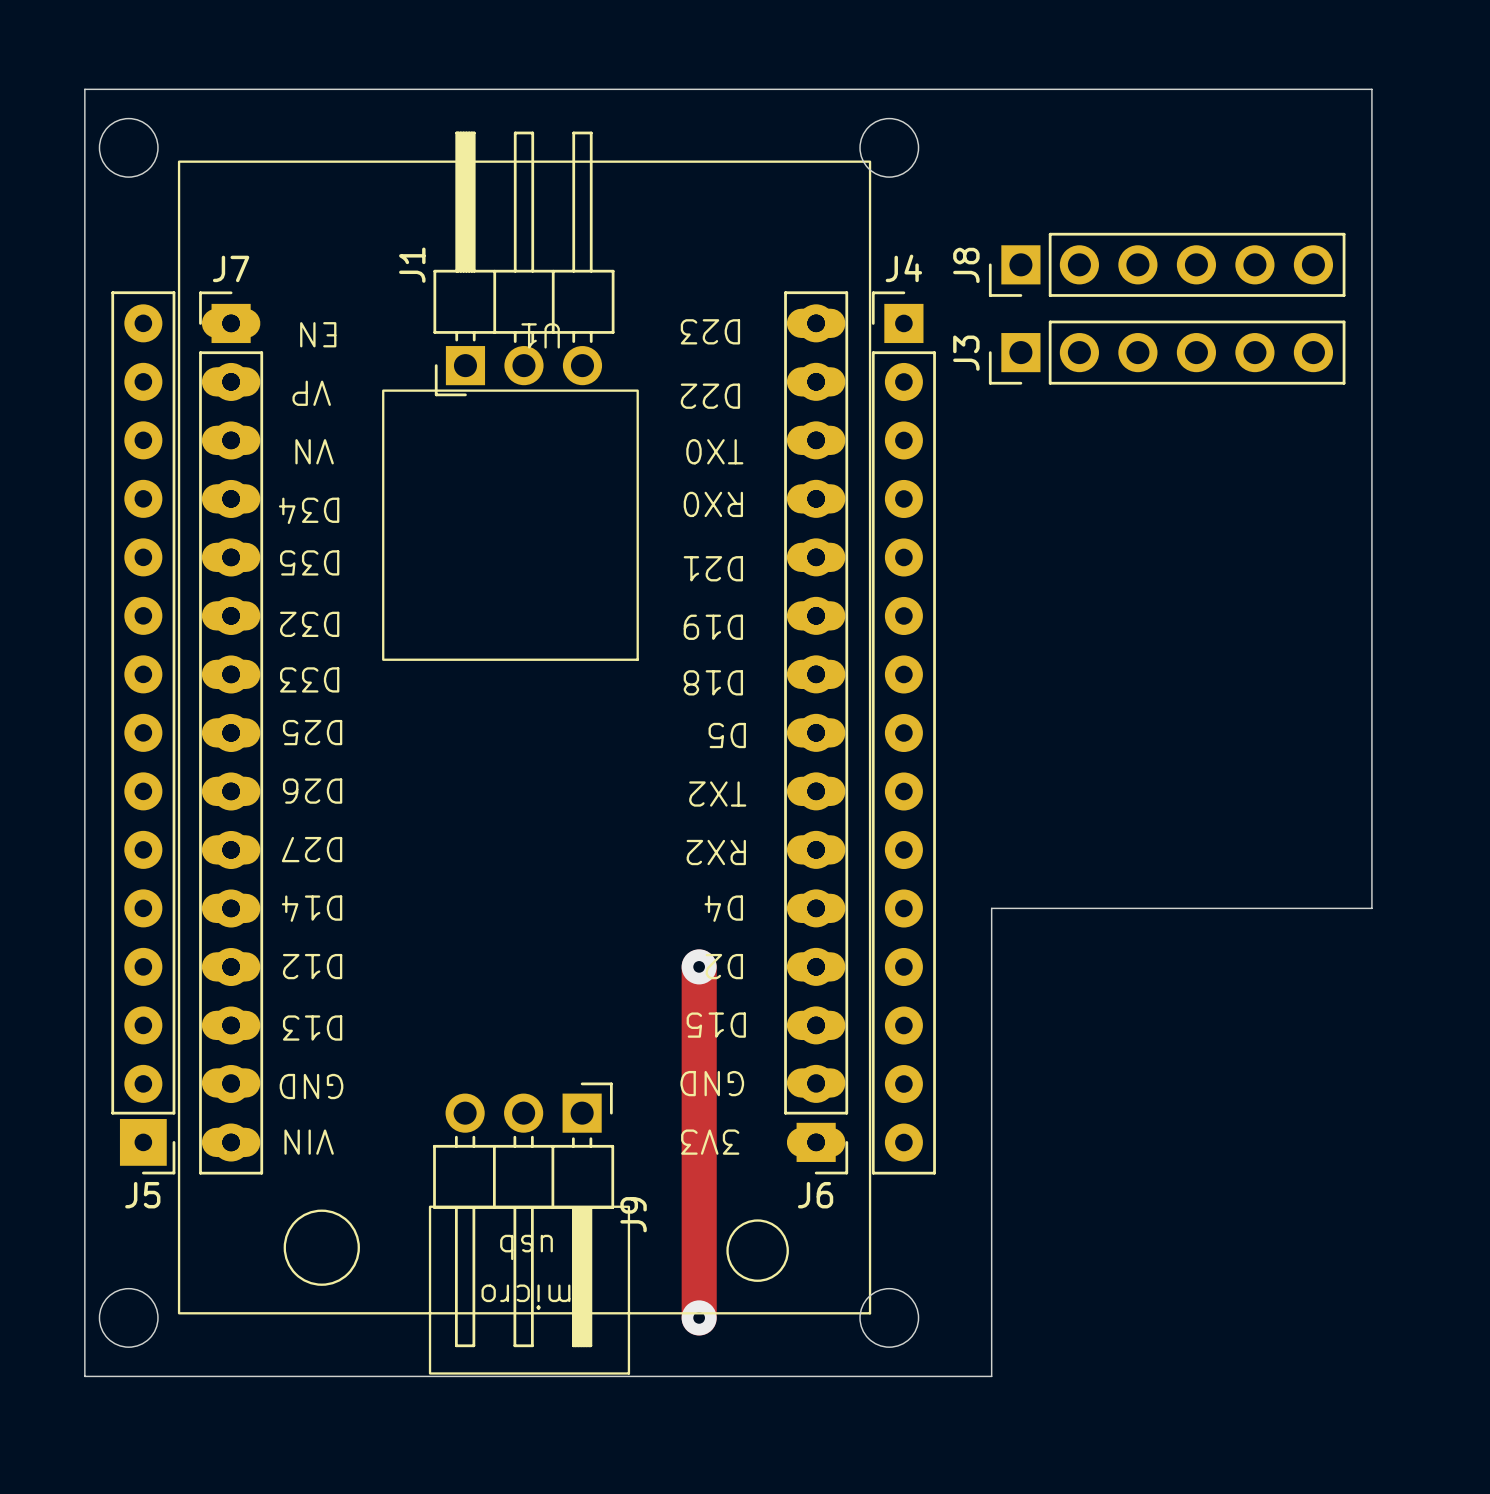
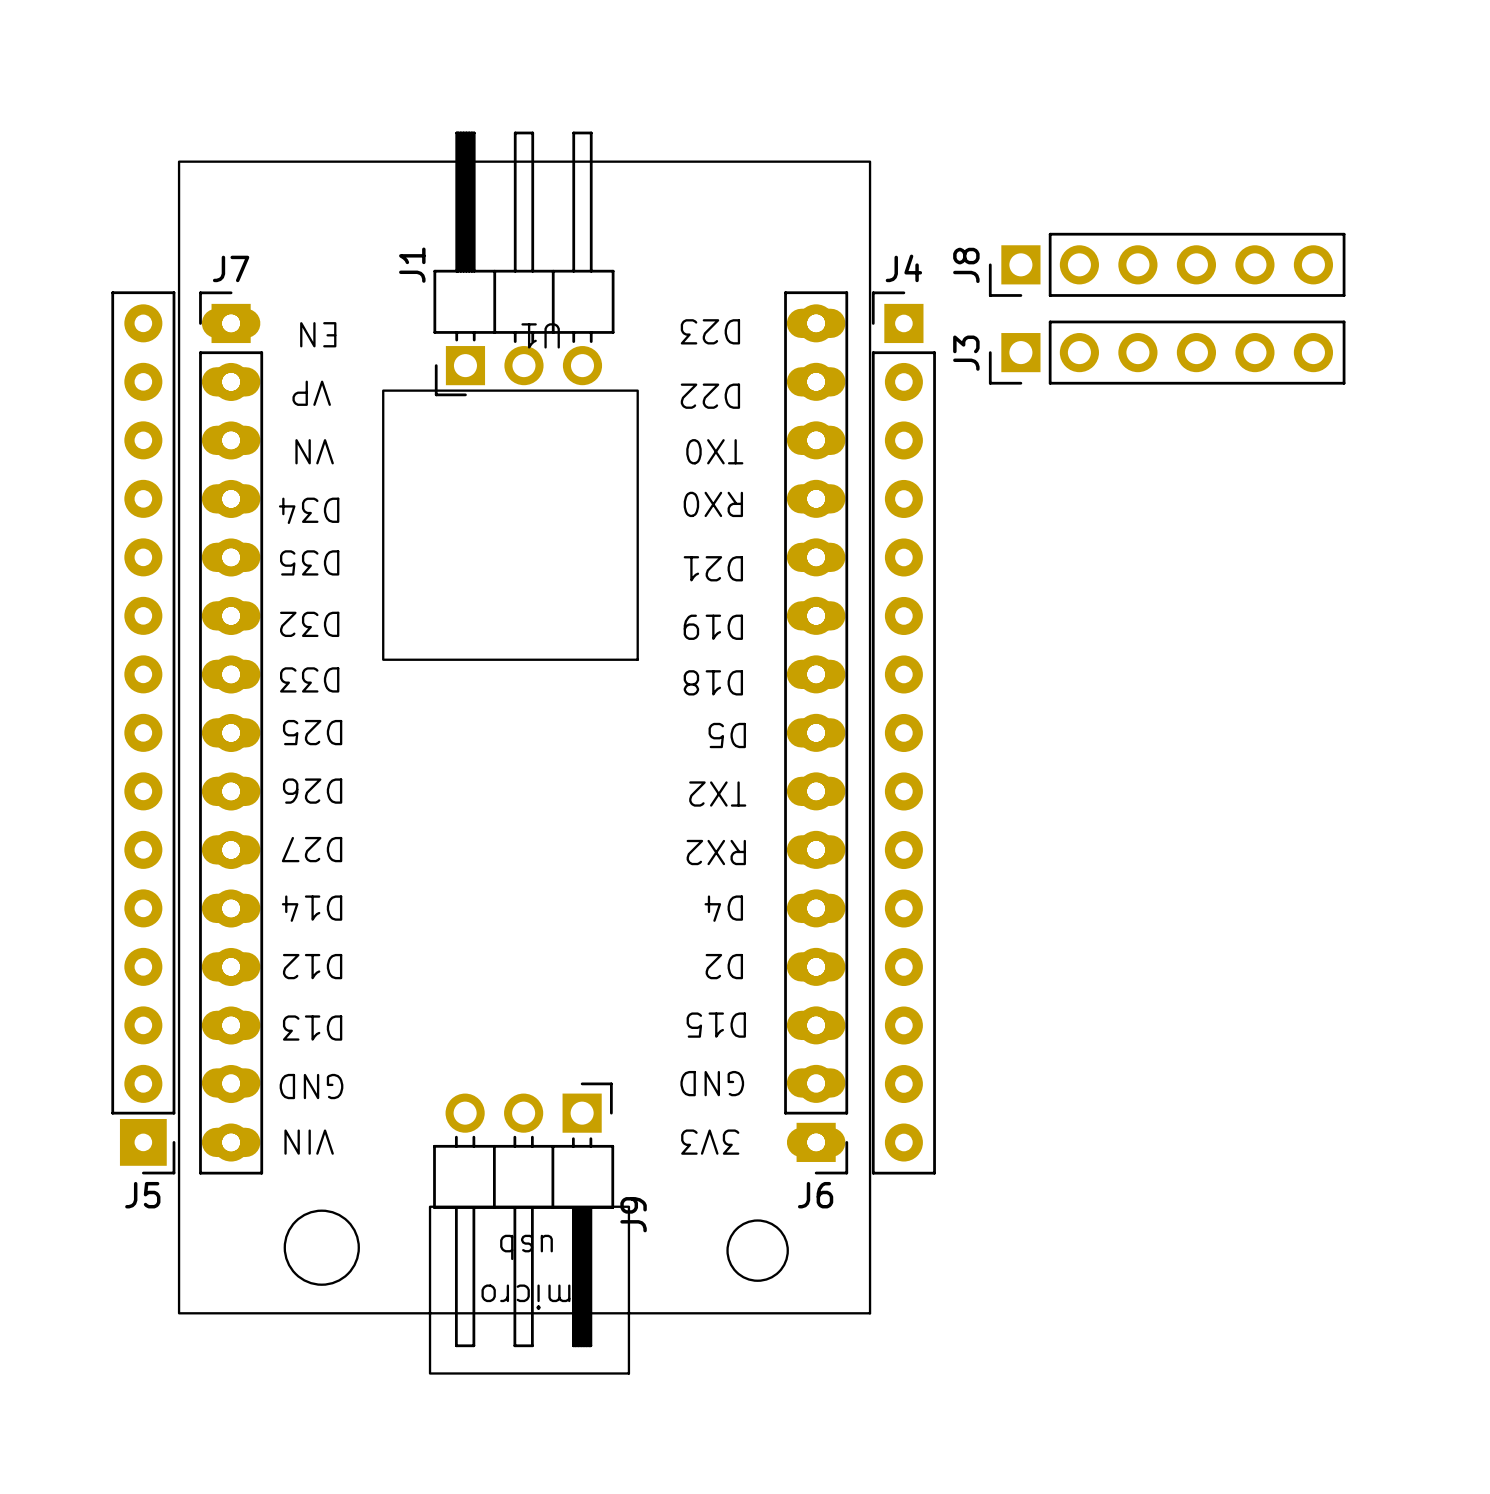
board edge: (84, 89) (84, 1376) (991, 1376) (991, 908) (1371, 908) (1371, 89) (84, 89) -> none
round board edge: [98, 118, 159, 178] -> none
round board edge: [859, 118, 920, 178] -> none
via: (699, 966) -> none
track: (699, 967) (699, 1318) -> none
round board edge: [98, 1288, 159, 1348] -> none
round board edge: [859, 1288, 920, 1348] -> none
via: (699, 1317) -> none

